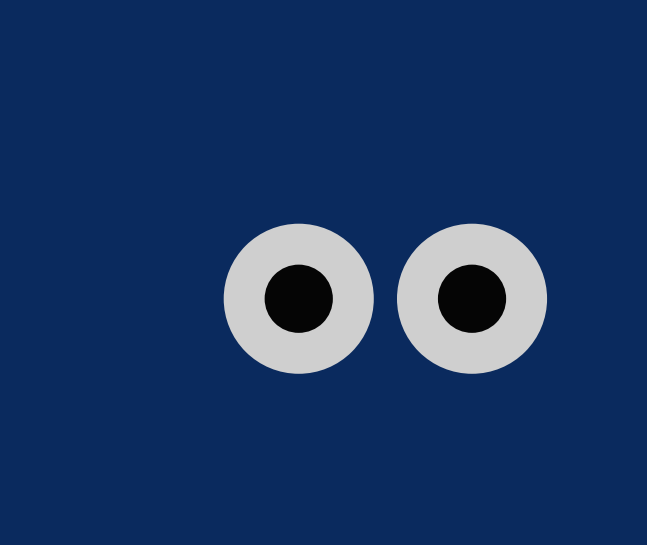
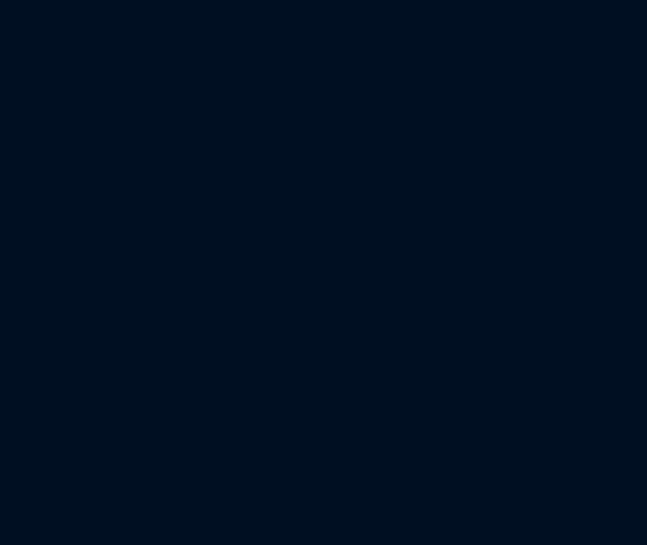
part: (385, 298) -> none

